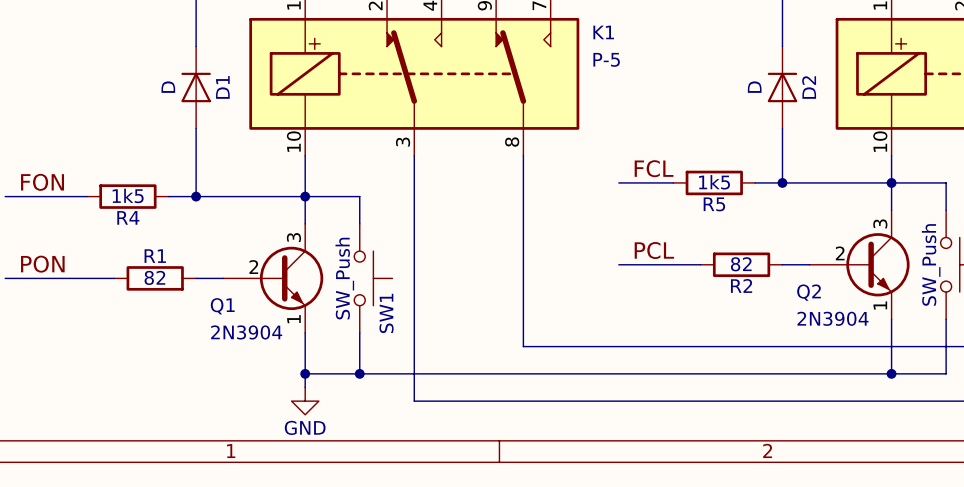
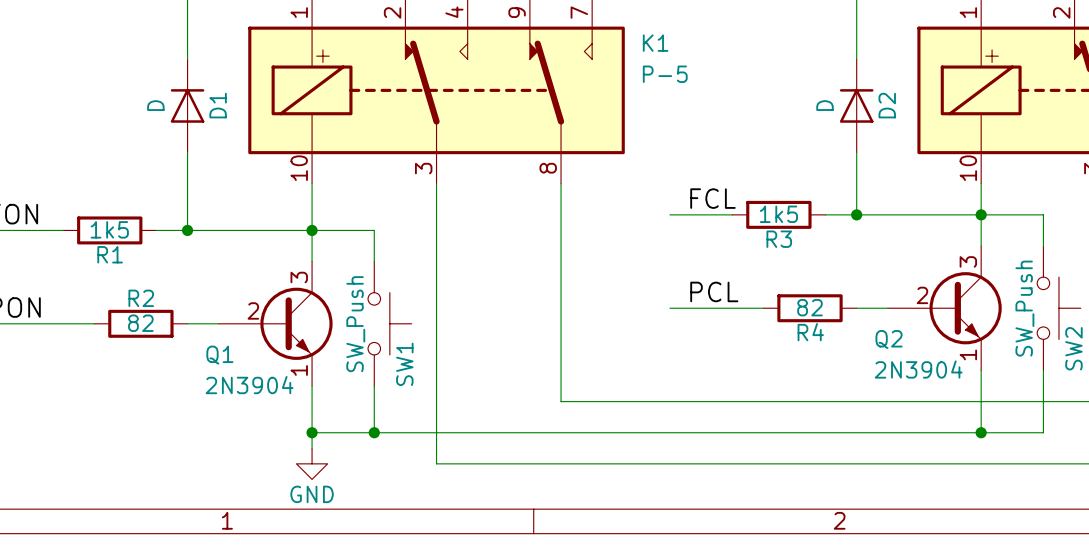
R5 name: R5 (714, 204) -> R3 (779, 239)
R4 name: R4 (128, 217) -> R1 (110, 254)
R1 name: R1 (155, 256) -> R2 (141, 298)
R2 name: R2 (741, 285) -> R4 (810, 332)

